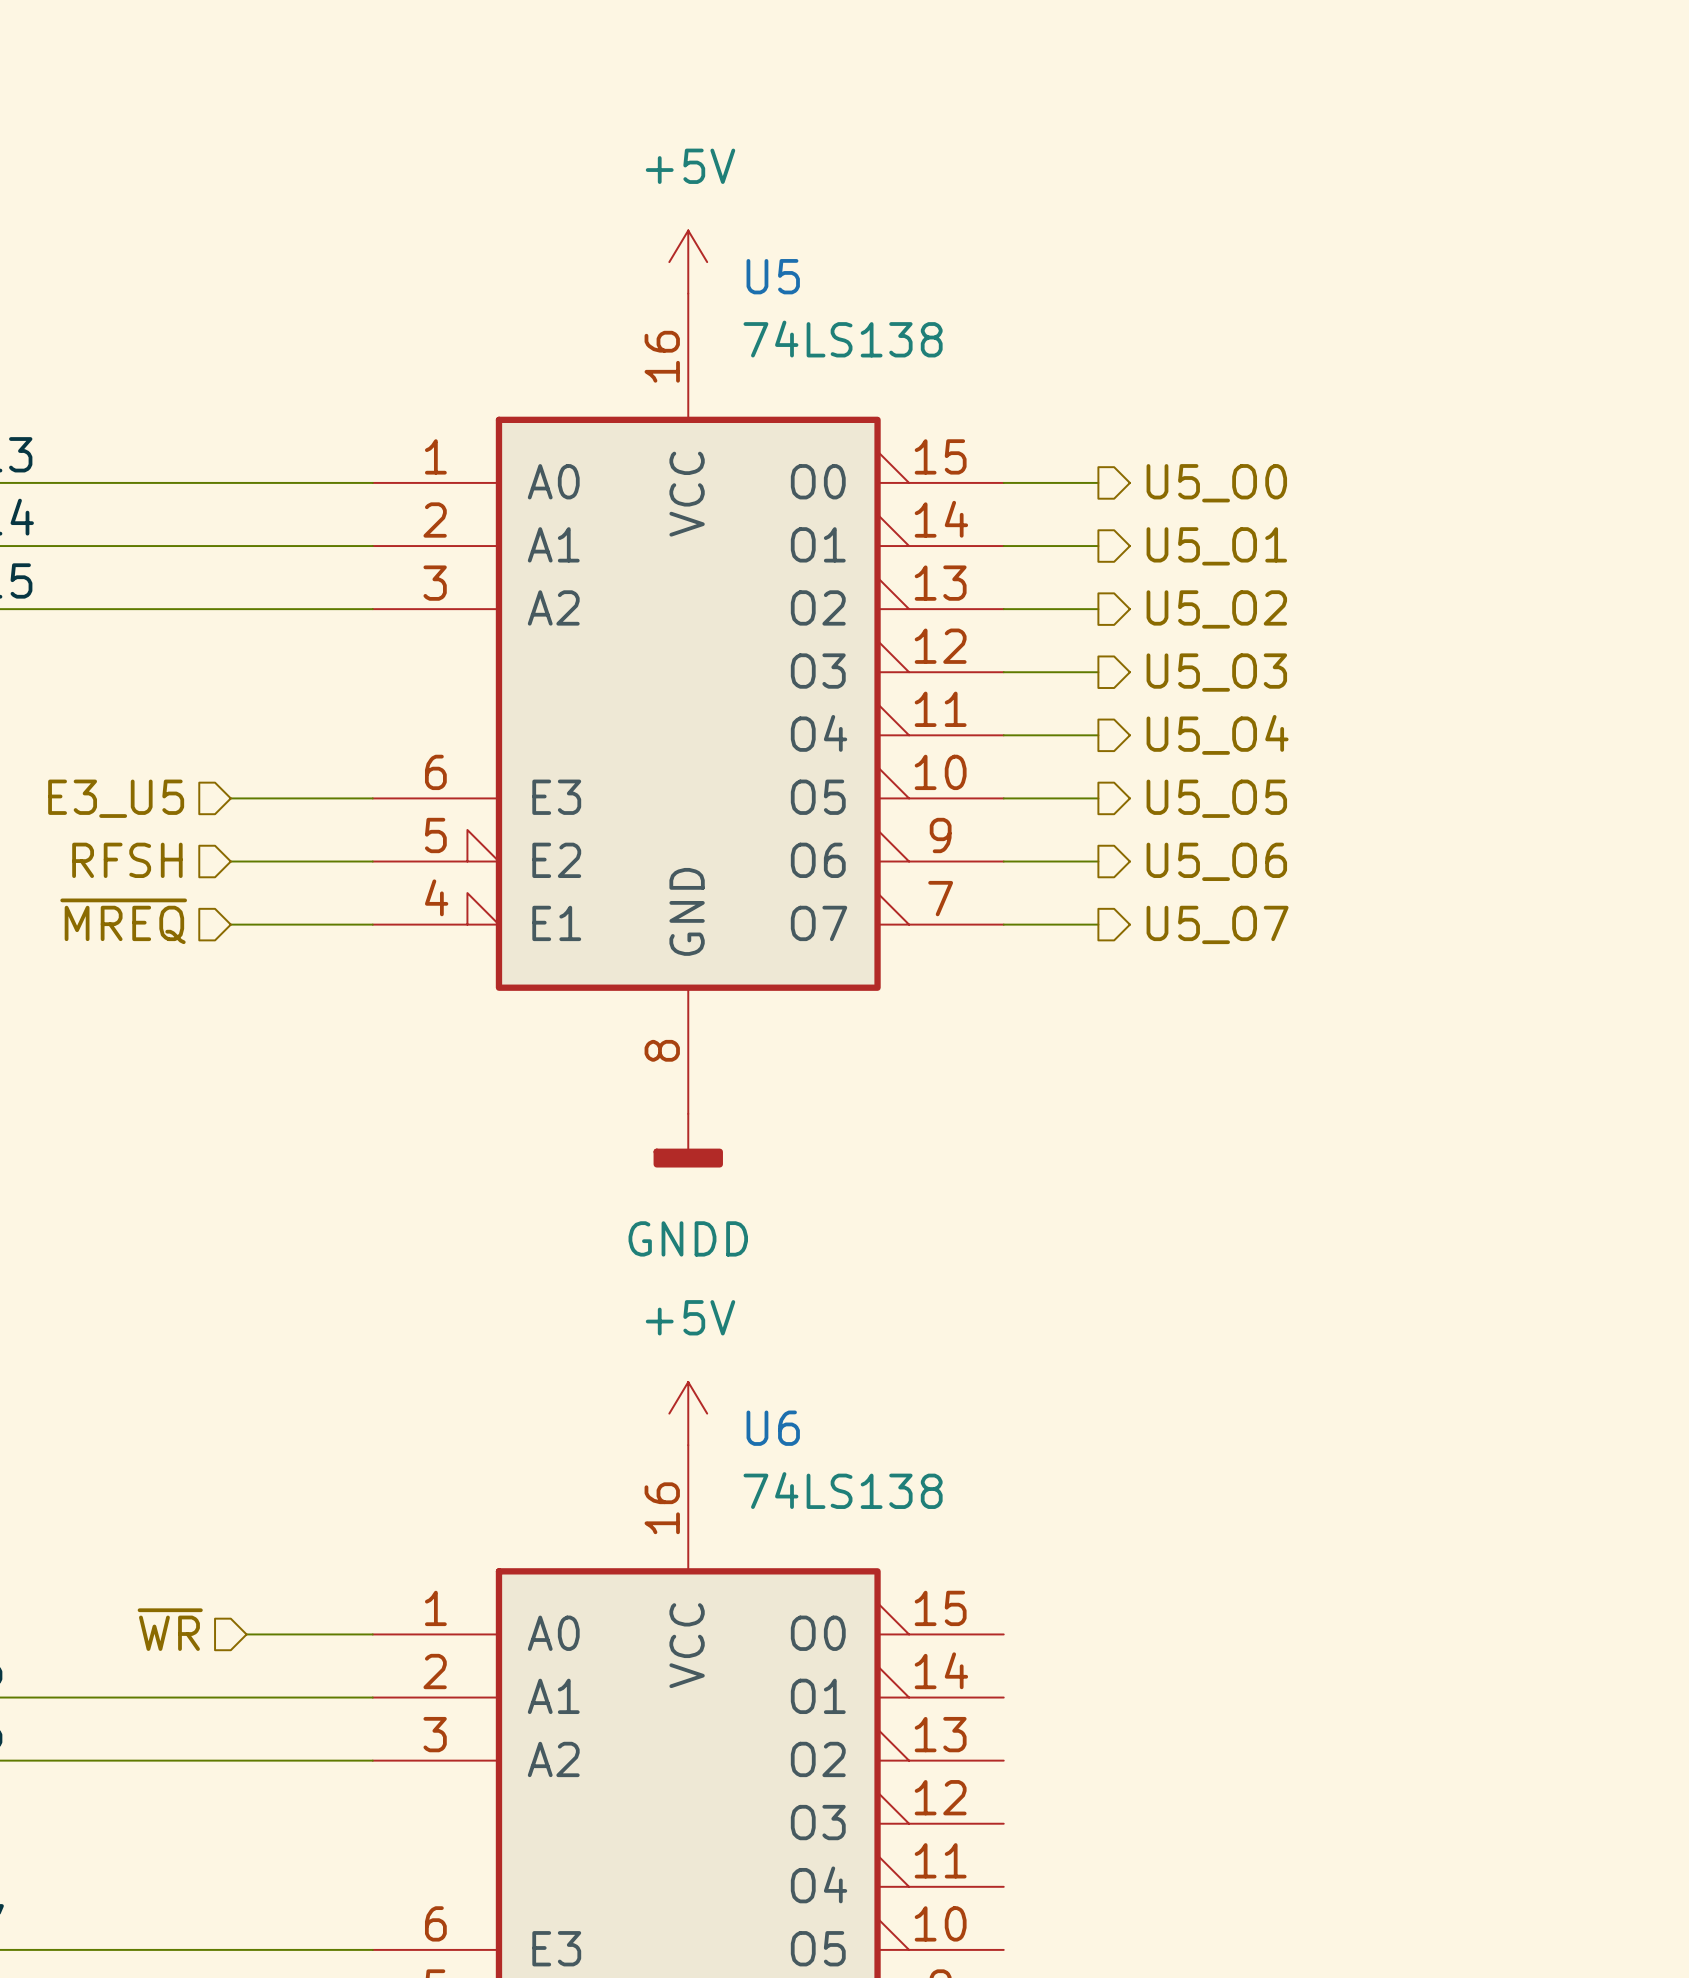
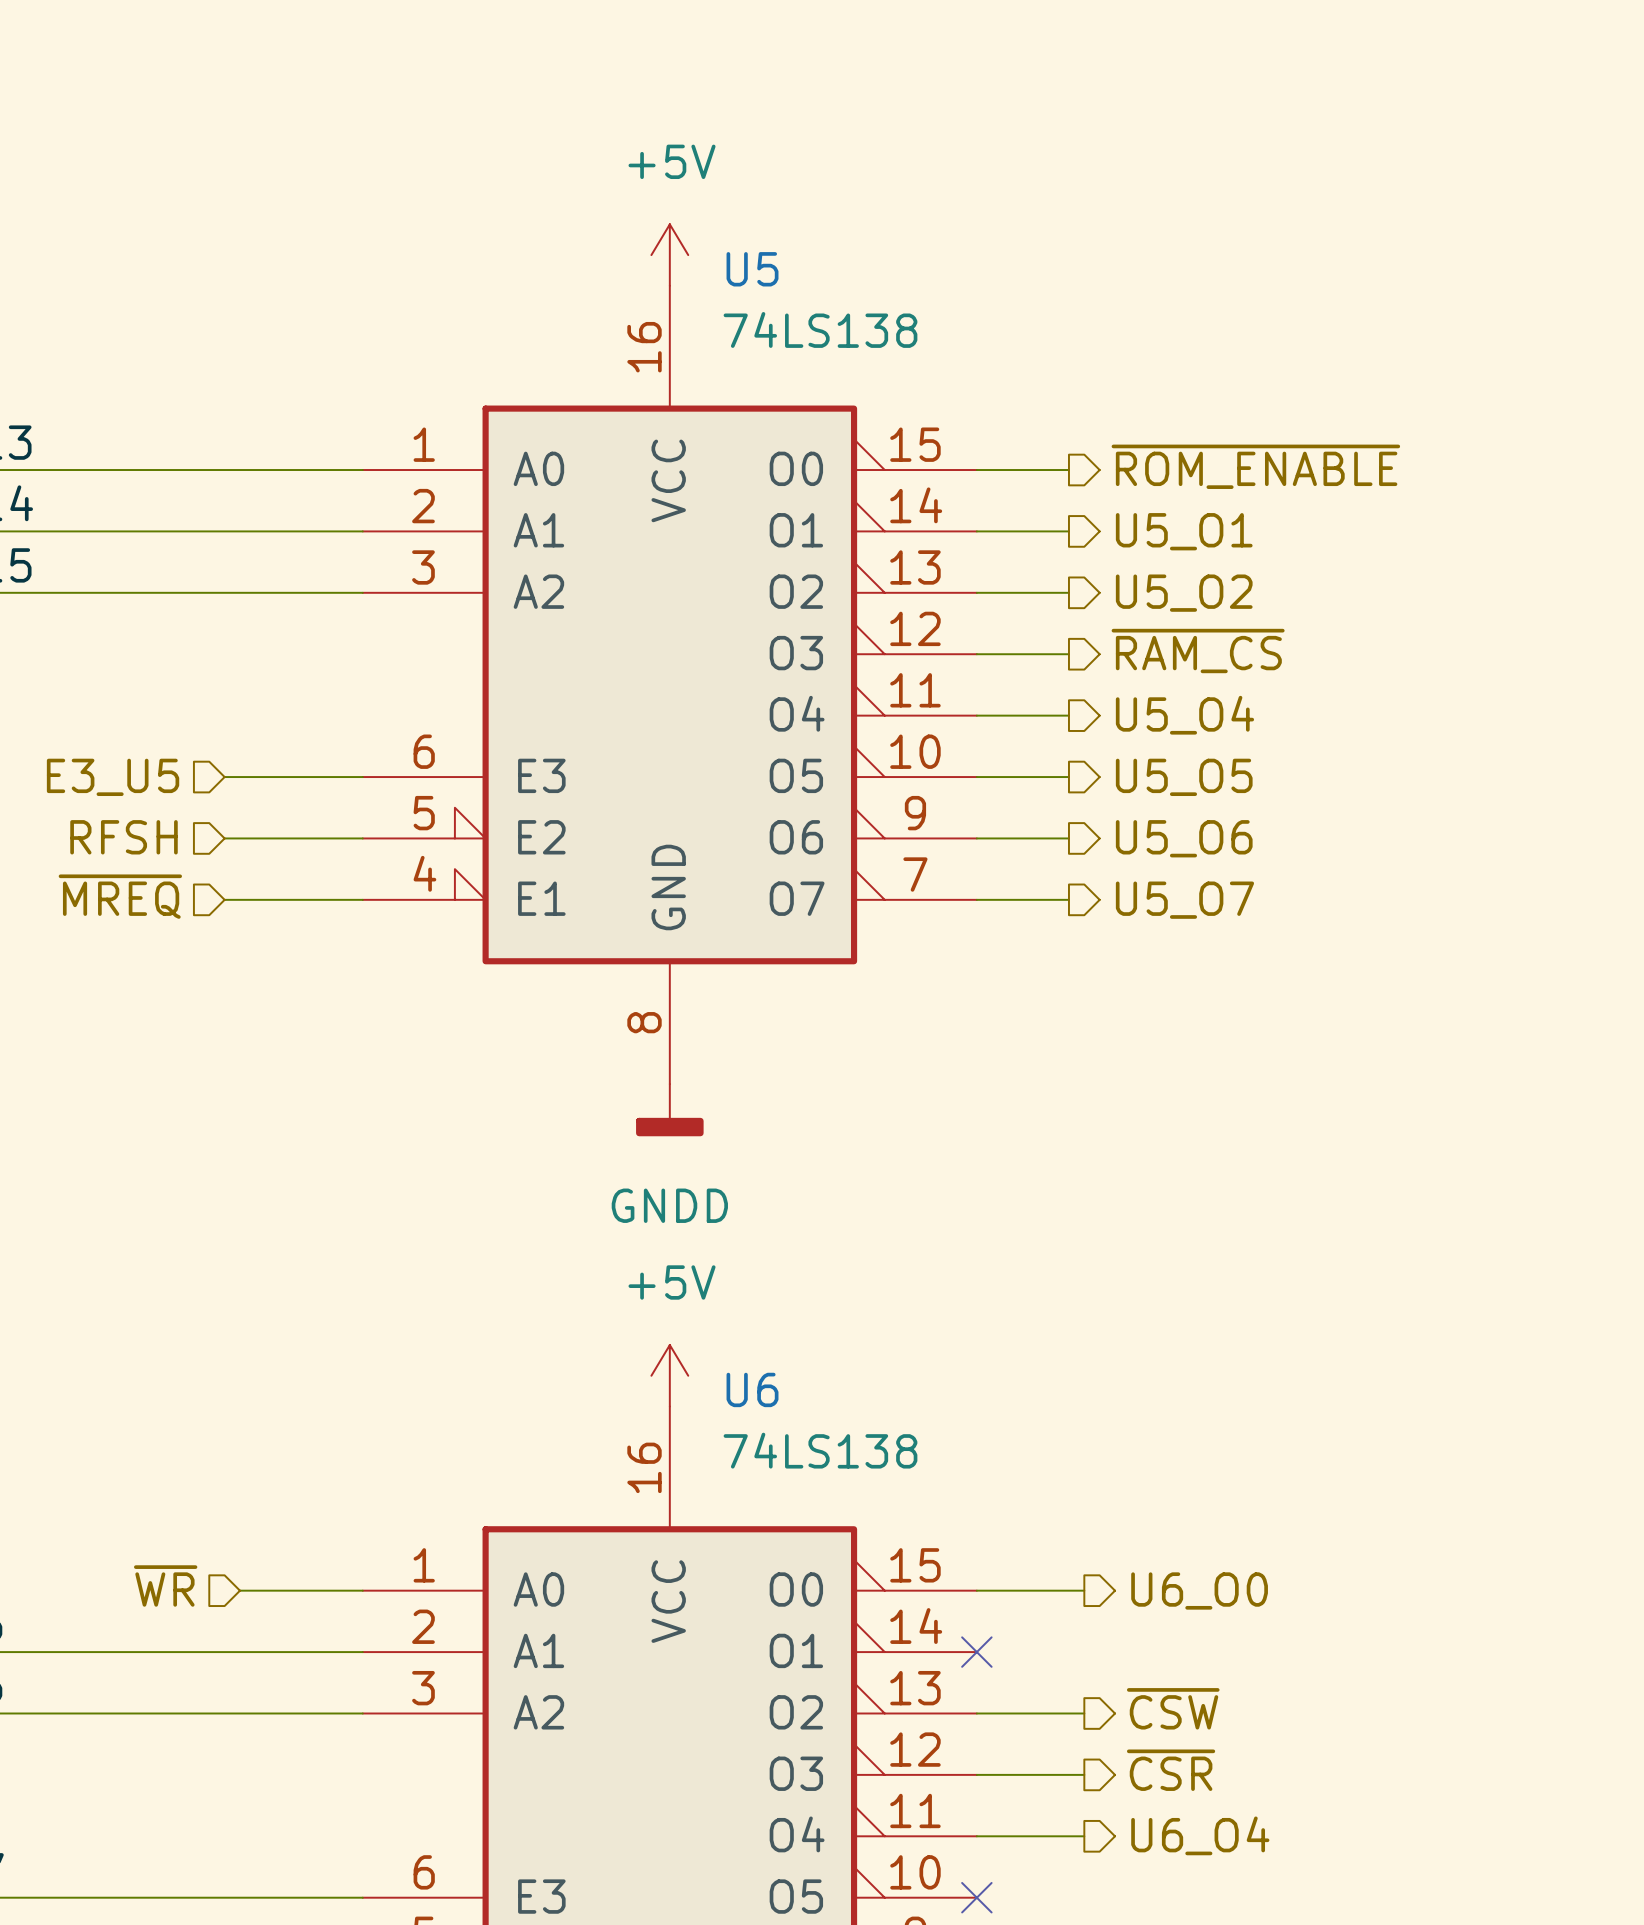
hierarchical label: U5_O0 (1216, 483) -> ~{ROM_ENABLE} (1255, 466)
hierarchical label: U5_O3 (1216, 672) -> ~{RAM_CS} (1198, 651)
wire: none -> (976, 1590) (1084, 1590)
hierarchical label: none -> U6_O0 (1199, 1590)
no-connect mark: none -> (976, 1652)
hierarchical label: none -> ~{CSW} (1173, 1708)
wire: none -> (976, 1713) (1084, 1713)
hierarchical label: none -> ~{CSR} (1171, 1770)
wire: none -> (976, 1774) (1084, 1774)
wire: none -> (976, 1836) (1084, 1836)
hierarchical label: none -> U6_O4 (1200, 1835)
no-connect mark: none -> (976, 1897)

